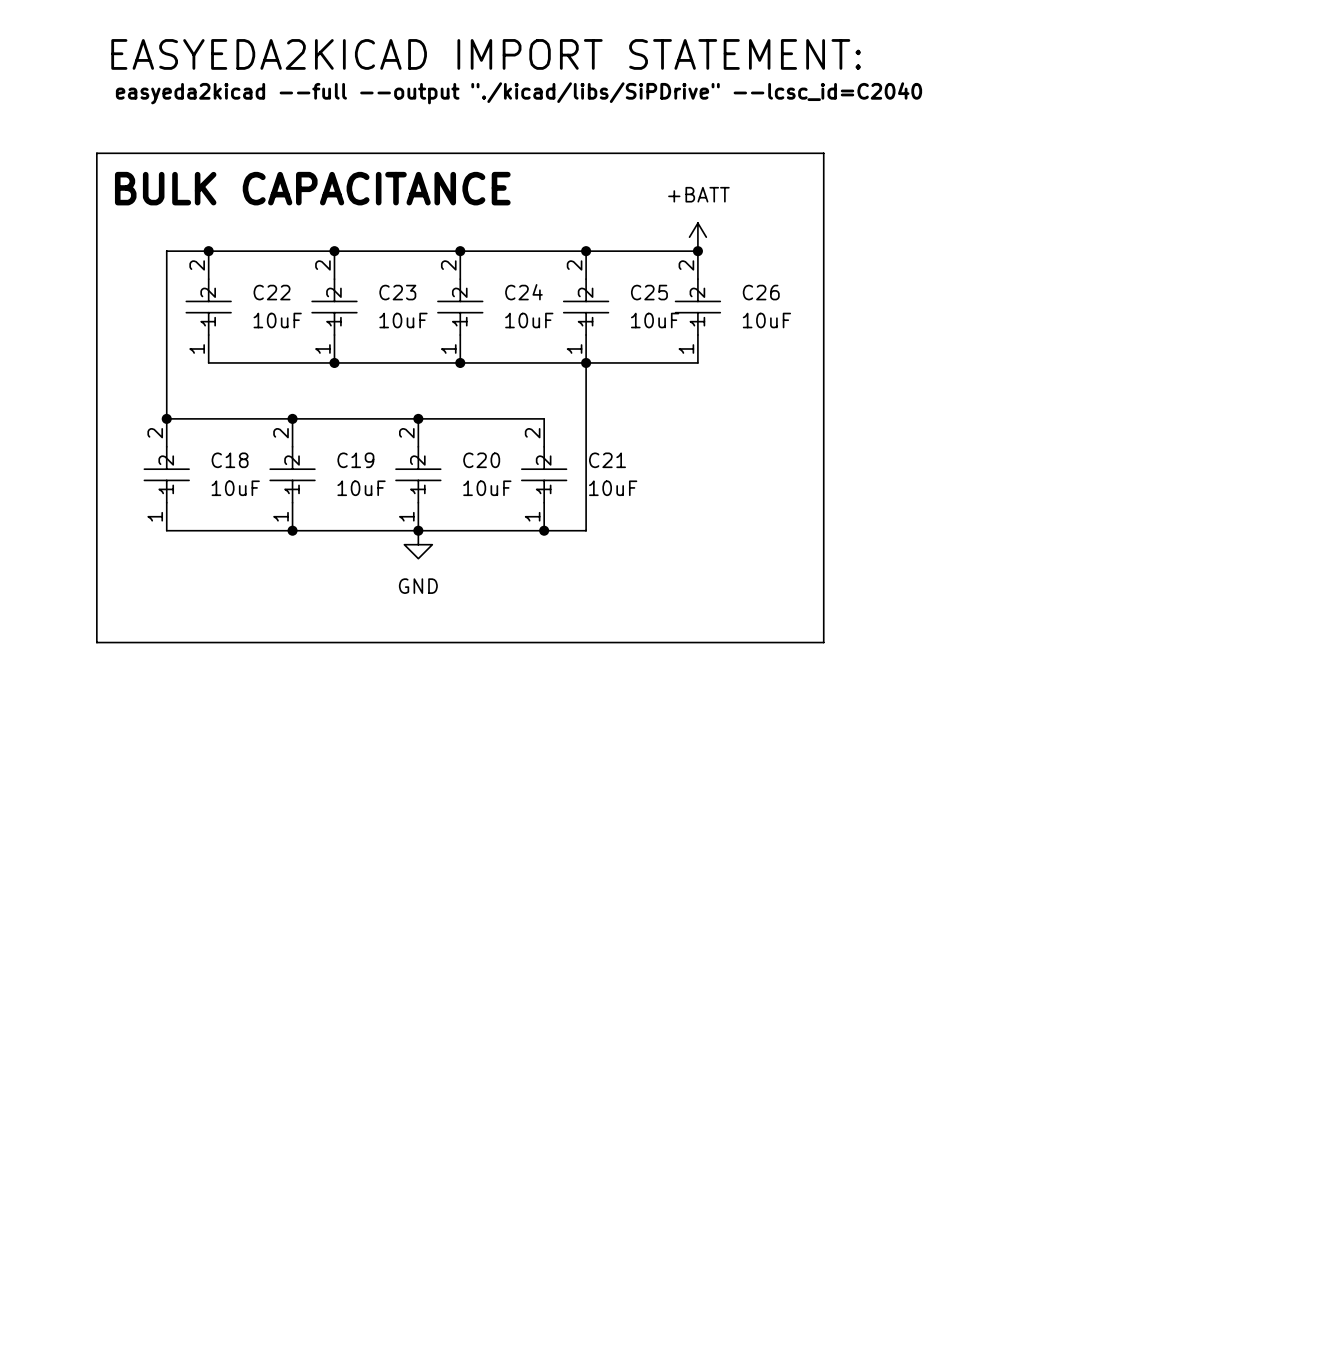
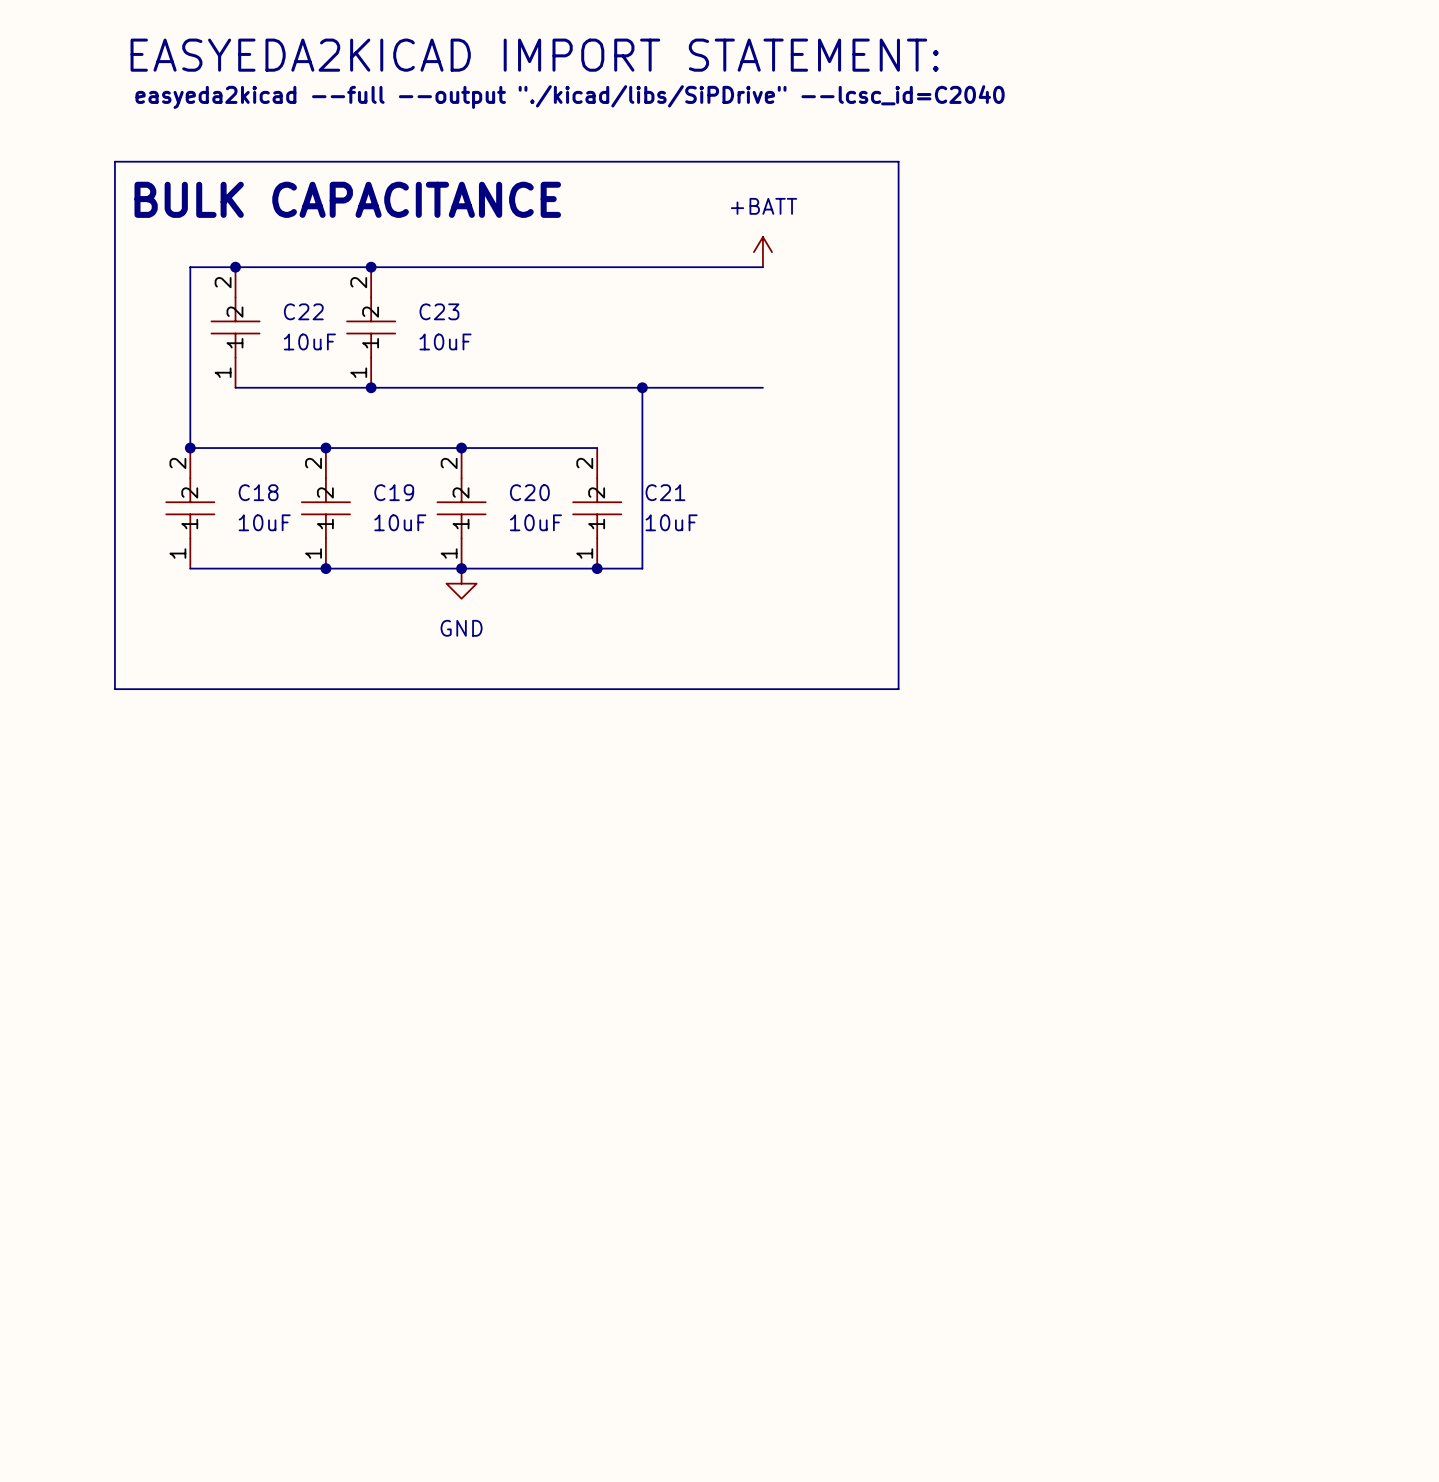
junction: (460, 251) -> none
junction: (586, 251) -> none
junction: (697, 251) -> none
C24: 10uF (460, 307) -> none
C25: 10uF (586, 307) -> none
C26: 10uF (697, 307) -> none
junction: (460, 362) -> none

